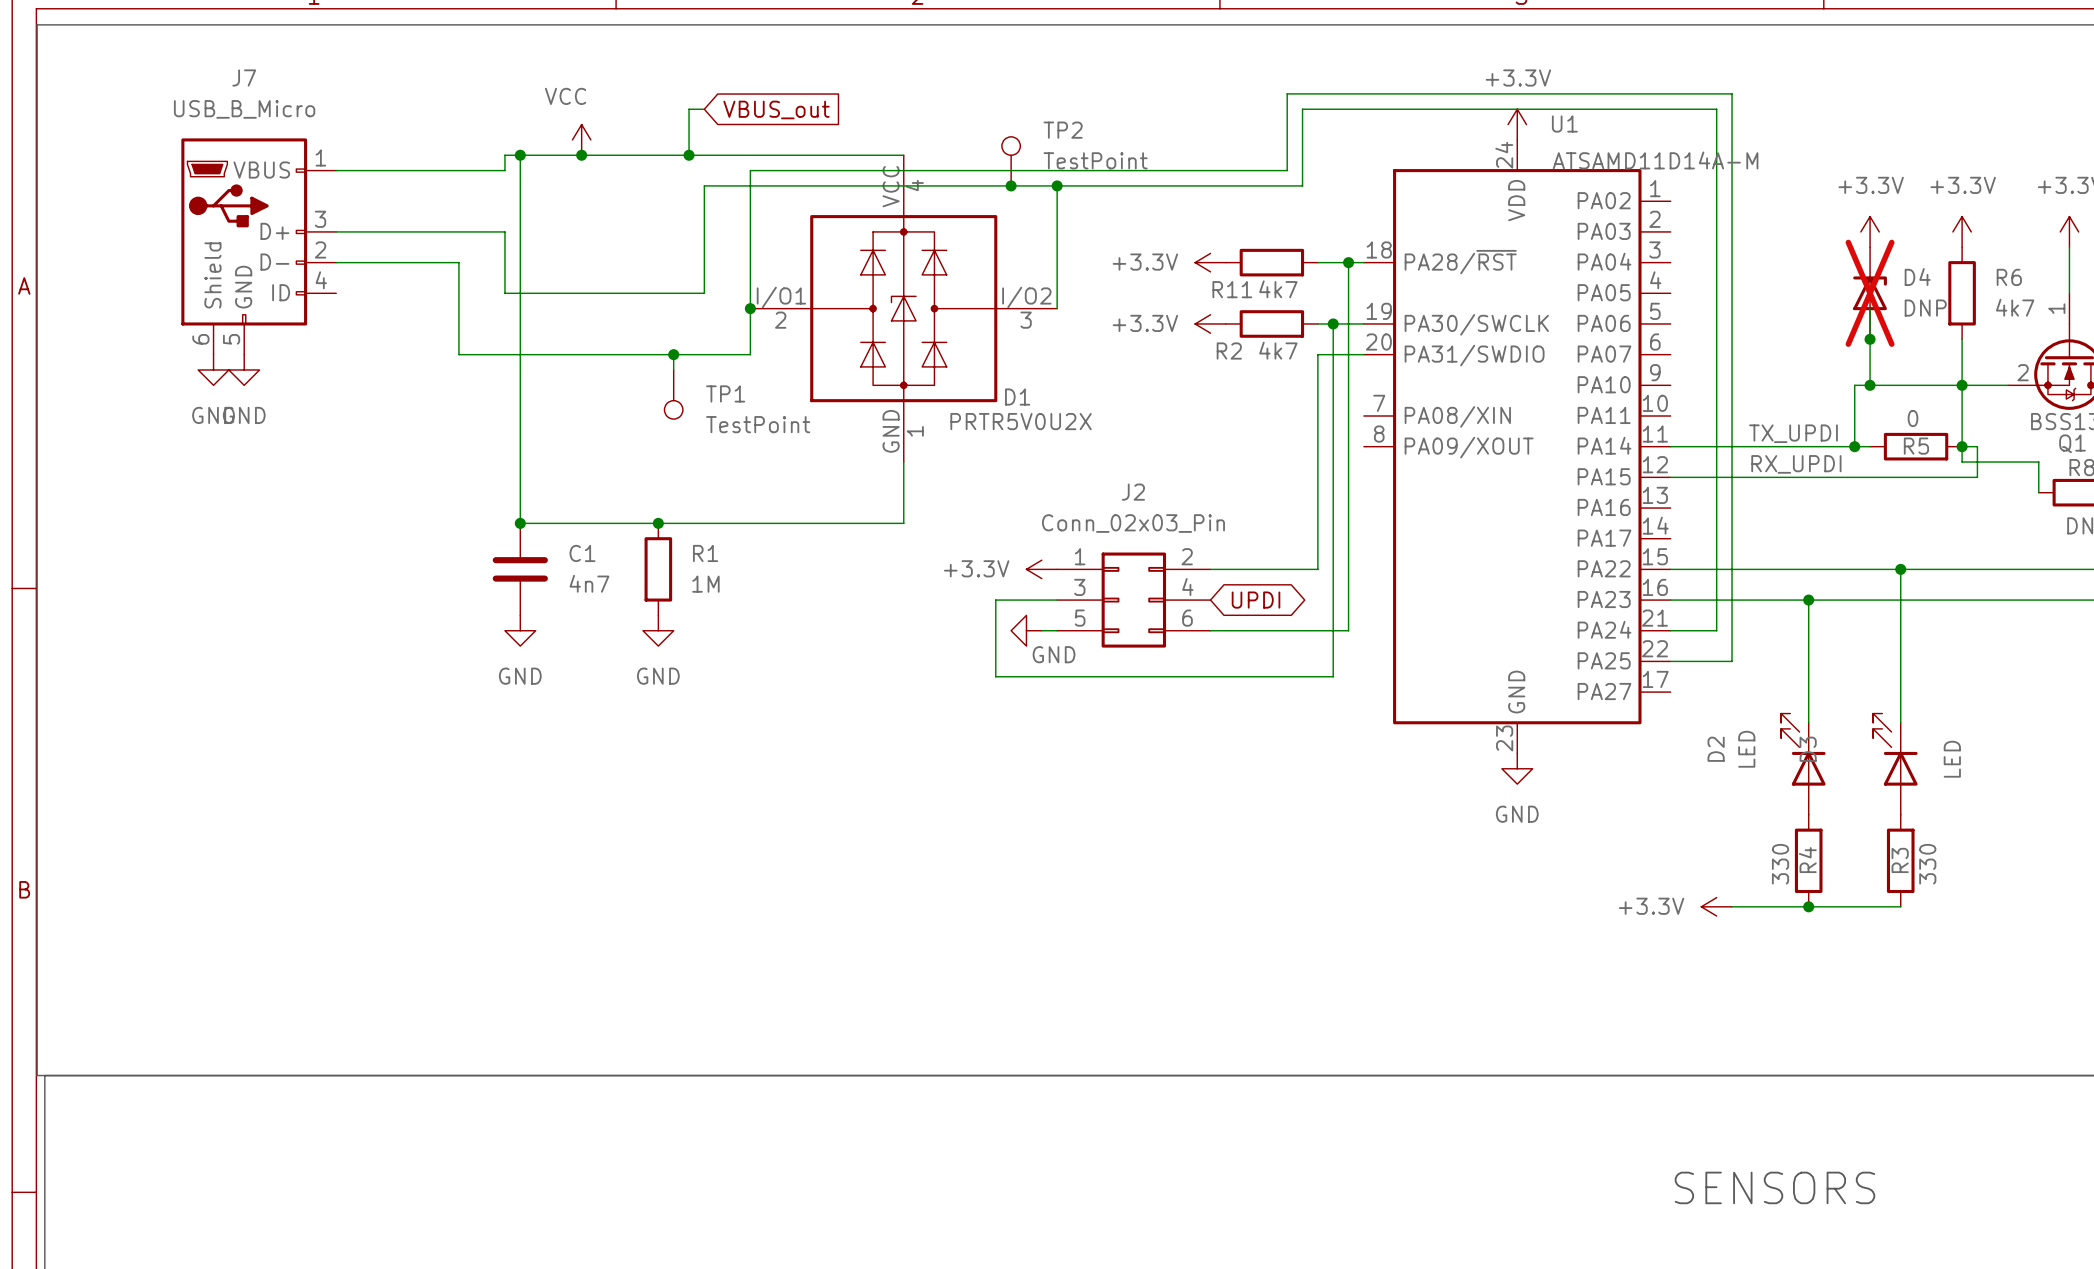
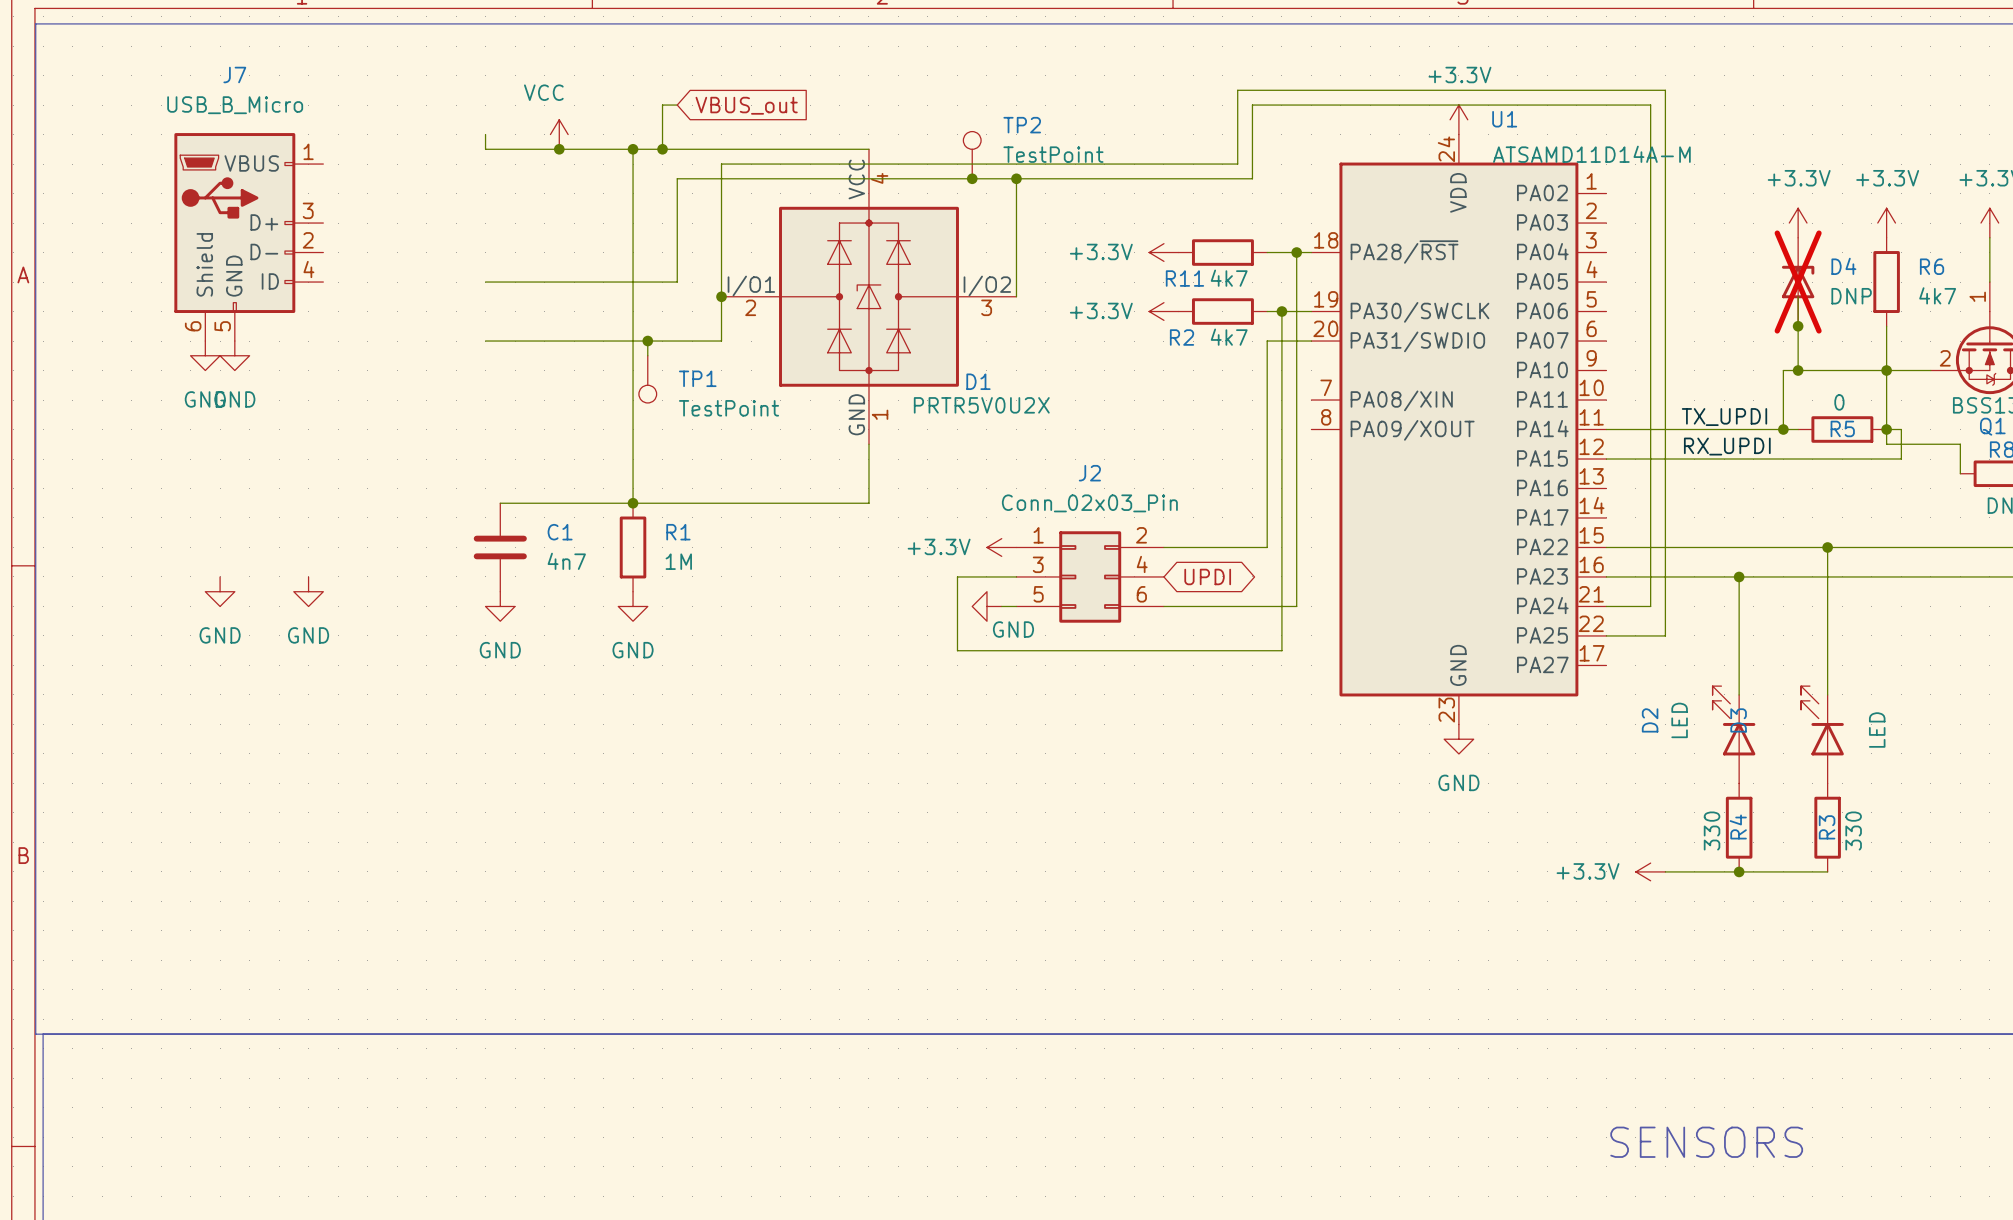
wire: (504, 155) (504, 170) (336, 170) -> (485, 149) (485, 134)
wire: (520, 155) (520, 523) -> (633, 149) (633, 503)
junction: (520, 155) -> none
junction: none -> (633, 149)
wire: (336, 231) (504, 231) (504, 293) -> none
wire: (336, 262) (458, 262) (458, 354) (504, 354) -> none
junction: (520, 523) -> none
power symbol: none -> GND (220, 591)
power symbol: none -> GND (308, 591)

